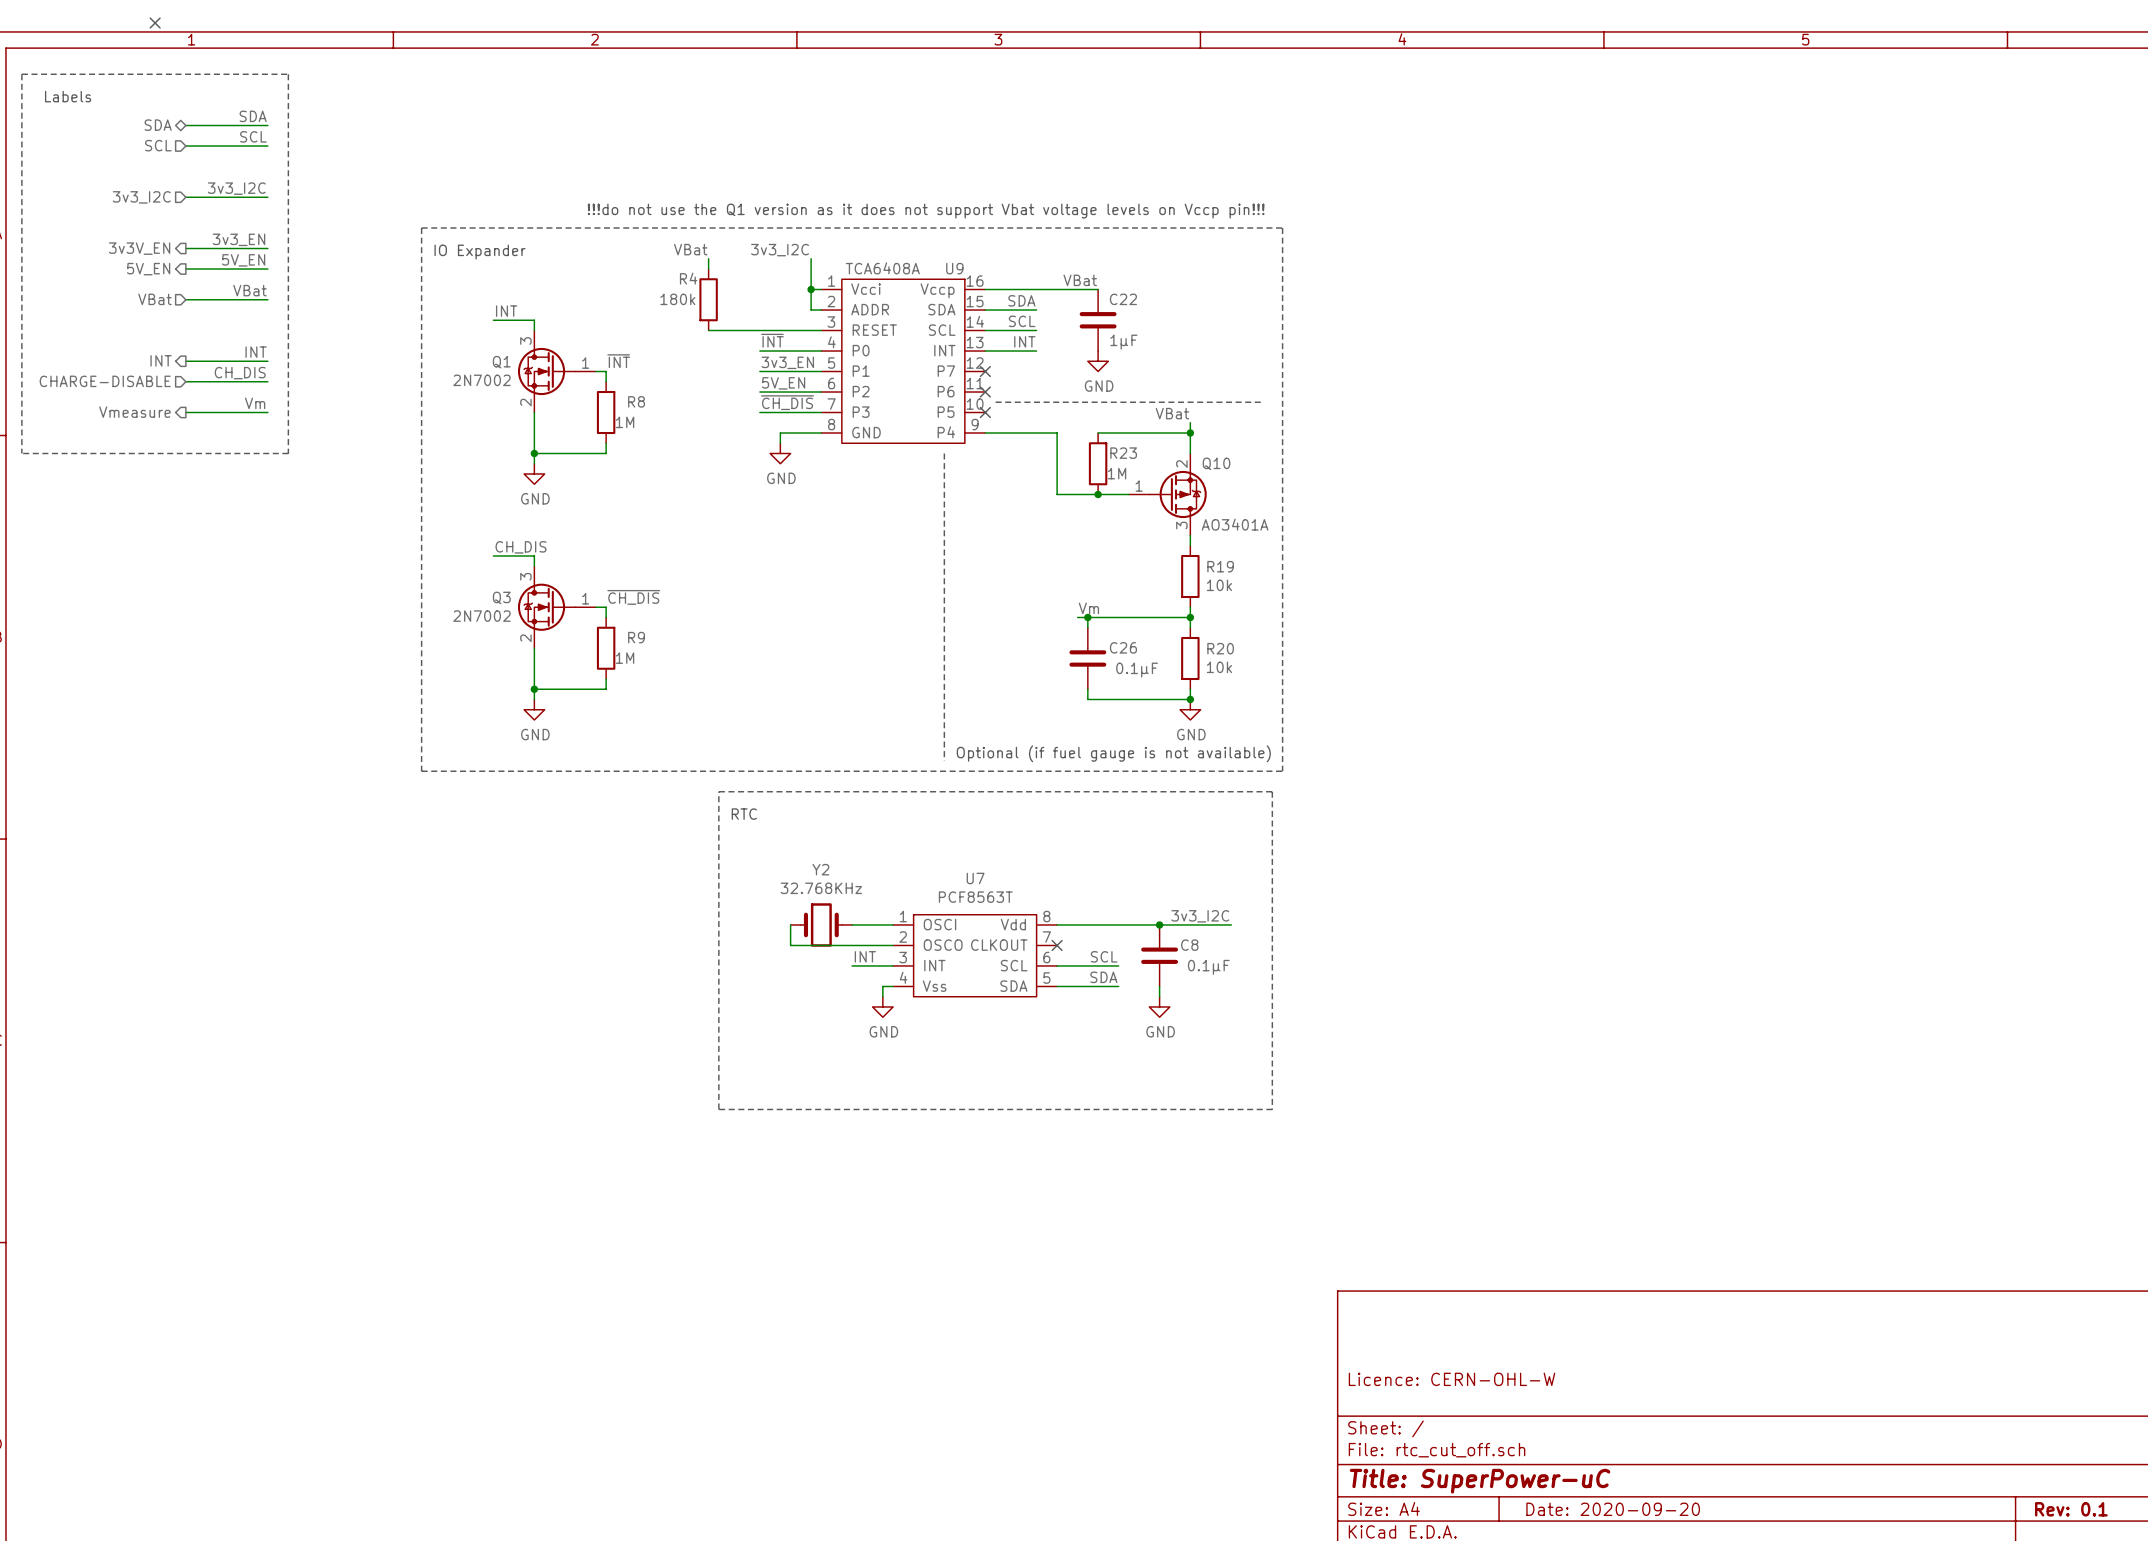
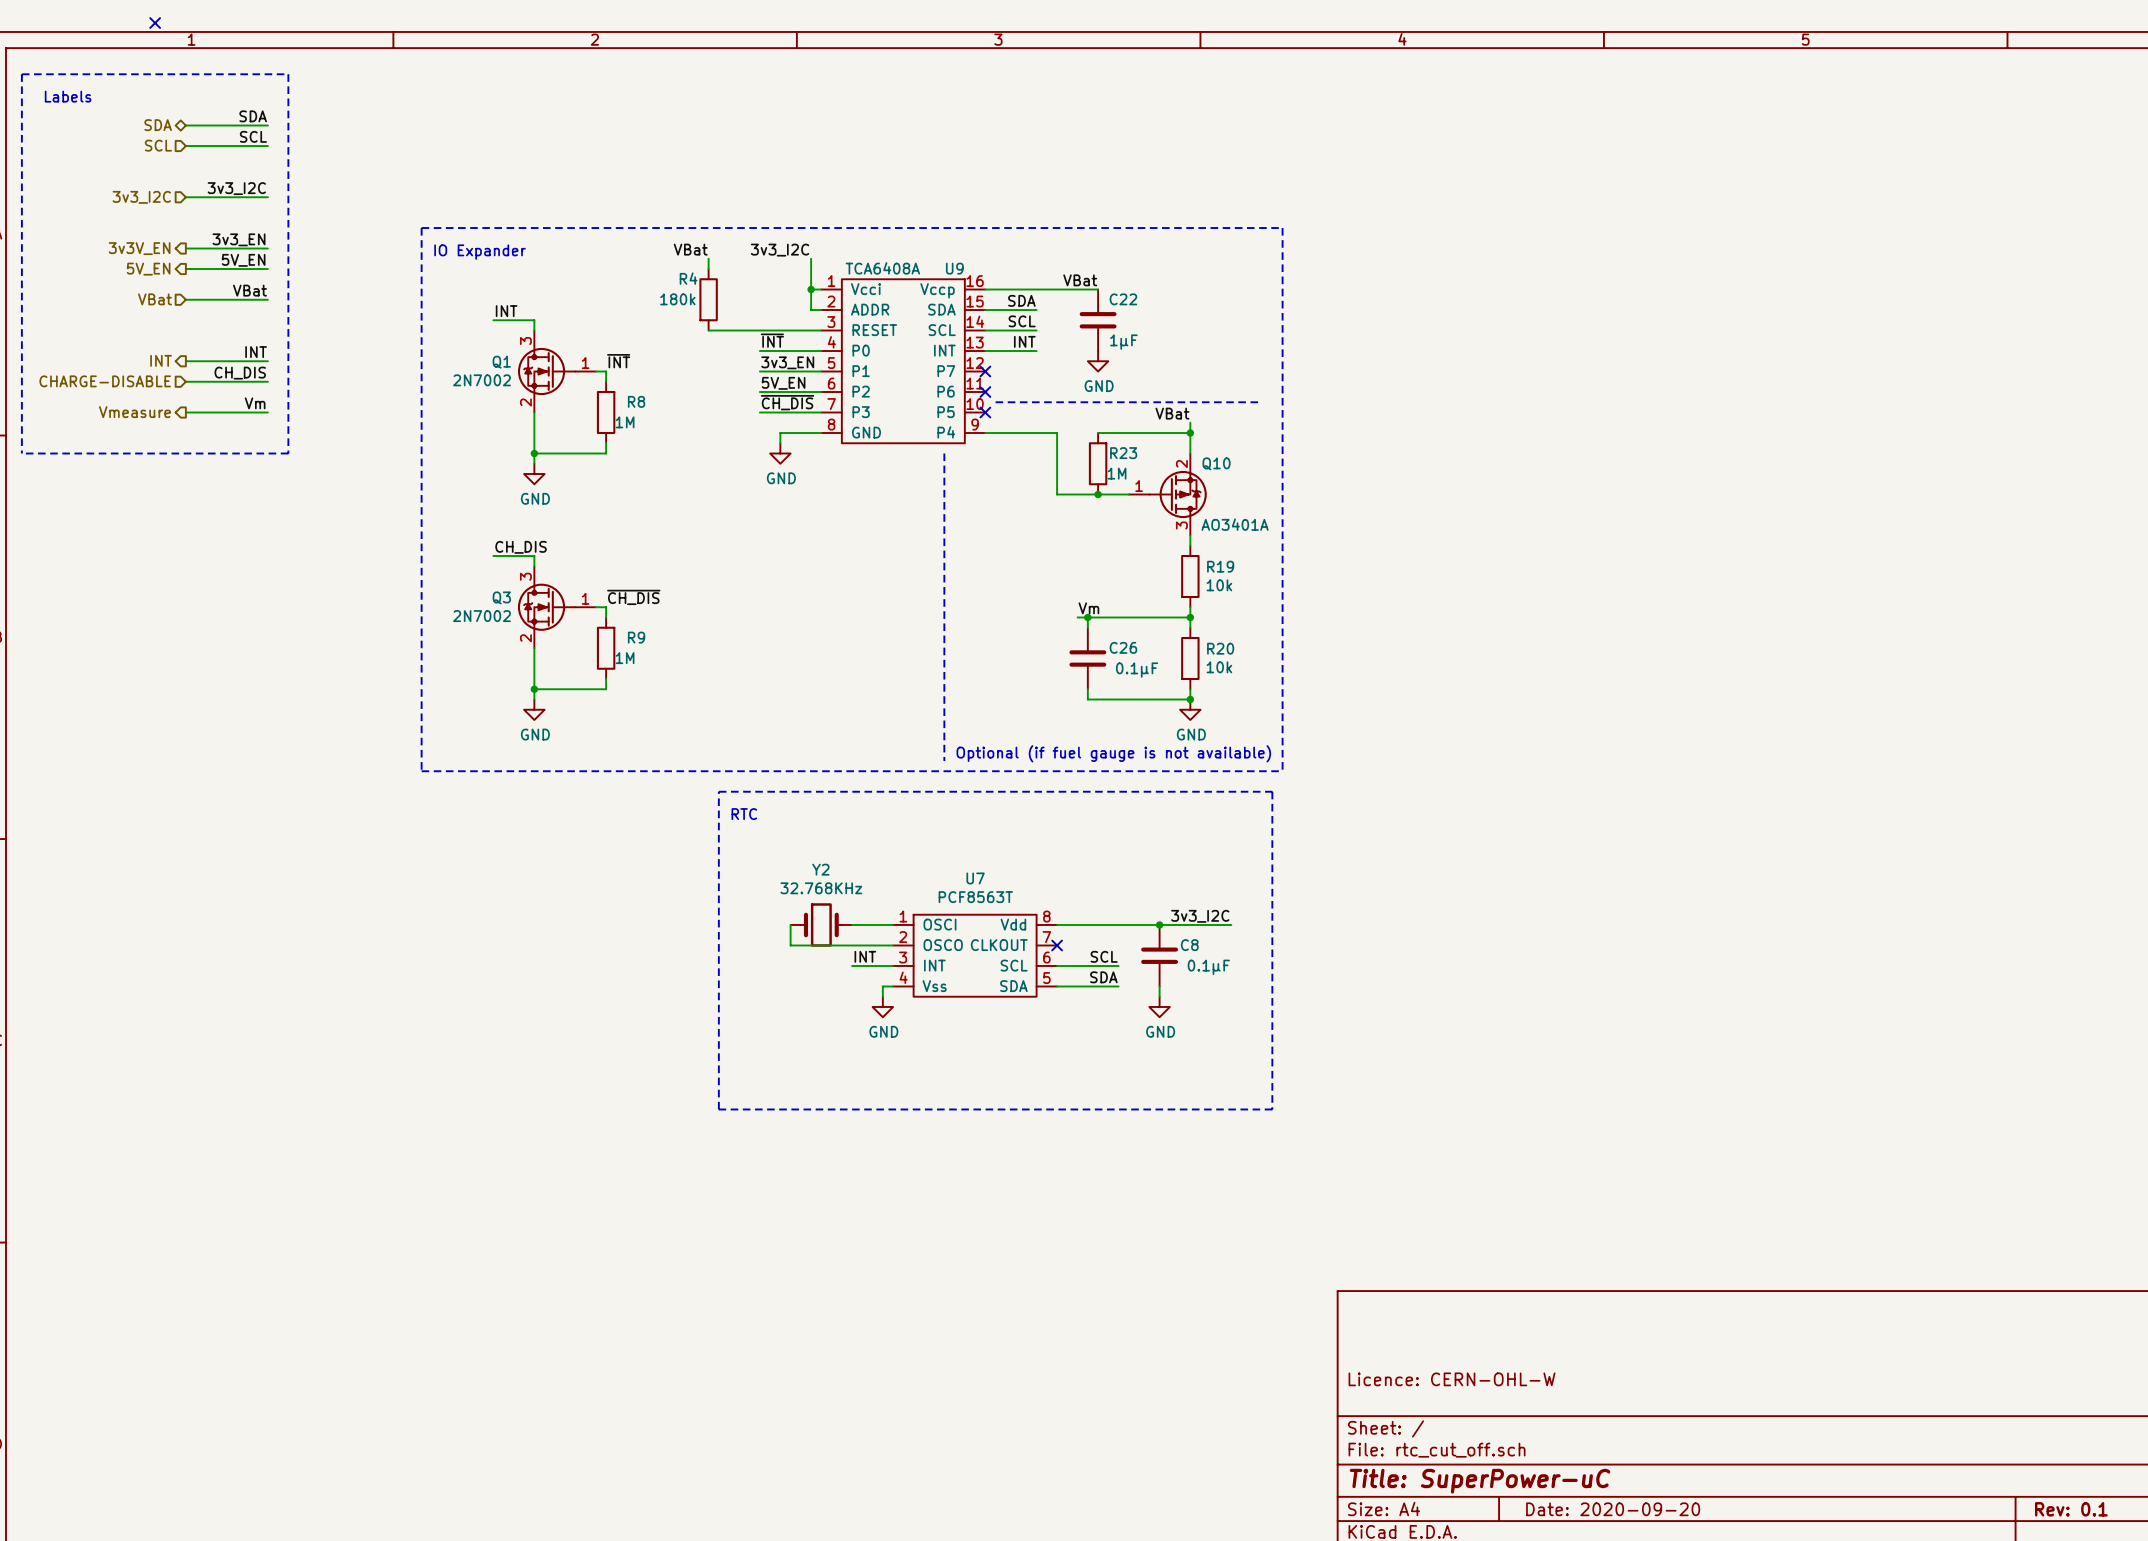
text: !!!do not use the Q1 version as it does not support Vbat voltage levels on Vccp pin!!! (926, 211) -> none

